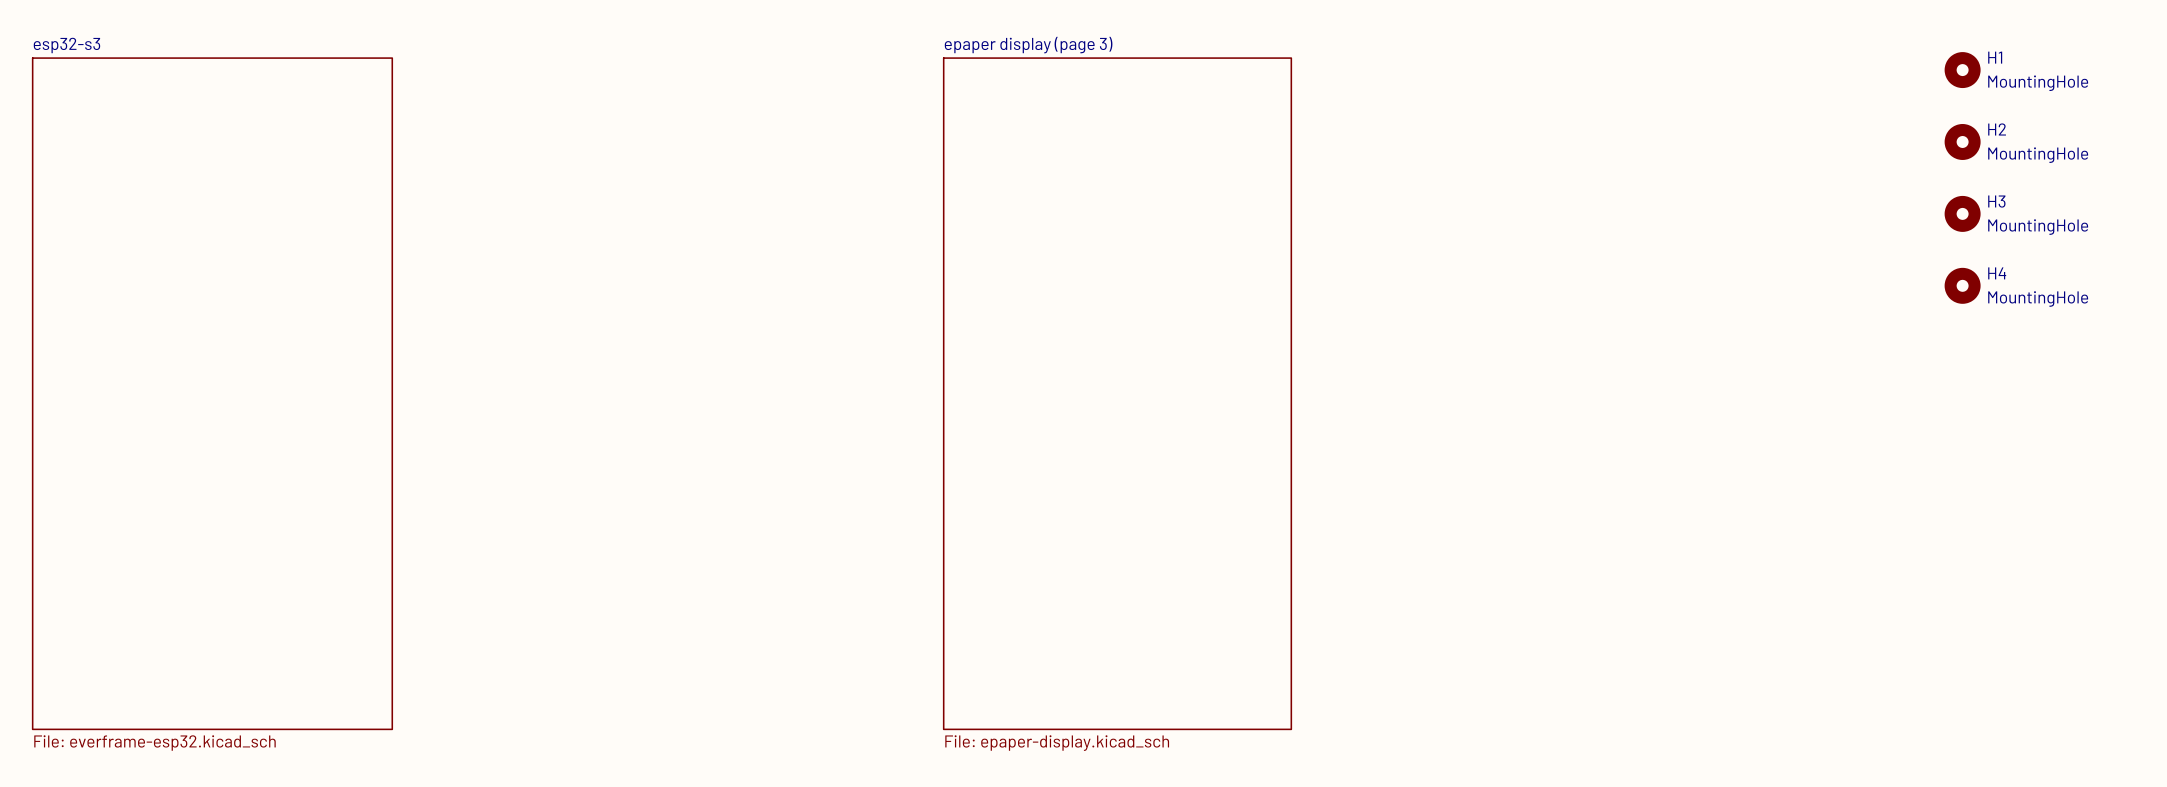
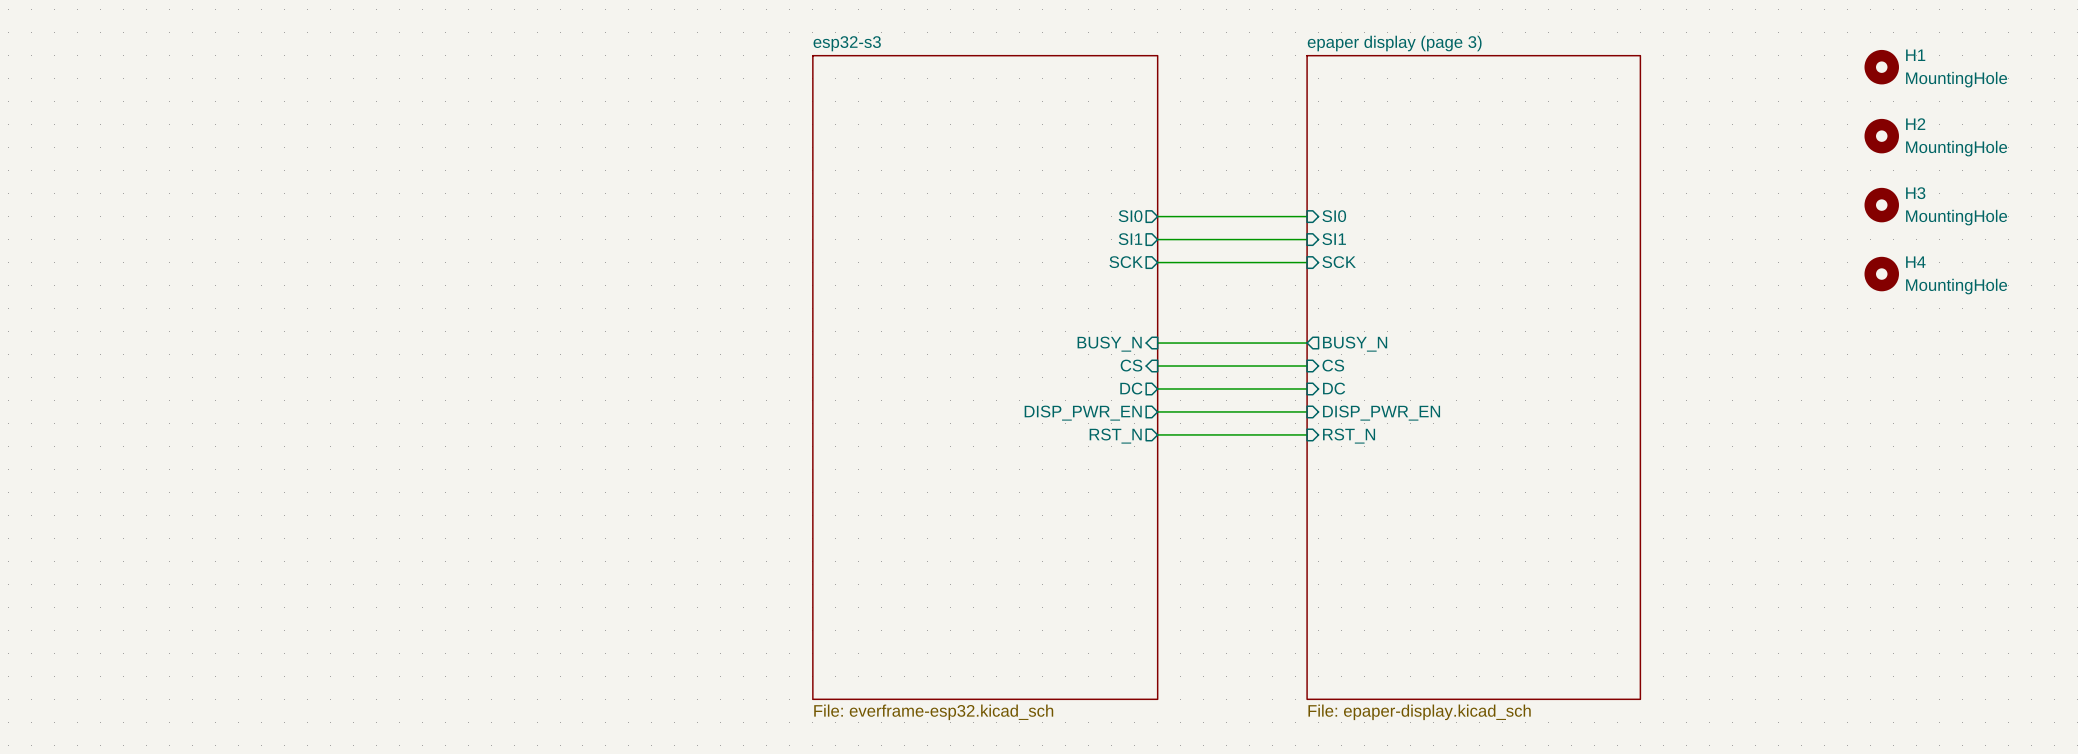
sheet pin: none -> SI0 (1130, 216)
wire: none -> (1157, 216) (1307, 216)
sheet pin: none -> SI0 (1334, 216)
sheet pin: none -> SI1 (1130, 239)
wire: none -> (1157, 239) (1307, 239)
sheet pin: none -> SI1 (1334, 239)
sheet pin: none -> SCK (1126, 262)
wire: none -> (1157, 262) (1307, 262)
sheet pin: none -> SCK (1339, 262)
sheet pin: none -> BUSY_N (1109, 344)
wire: none -> (1157, 343) (1307, 343)
sheet pin: none -> BUSY_N (1355, 344)
sheet pin: none -> CS (1131, 365)
wire: none -> (1157, 366) (1307, 366)
sheet pin: none -> CS (1333, 365)
sheet esp32-s3 position: (212, 393) -> (985, 377)
sheet epaper display (page 3) position: (1117, 393) -> (1473, 377)
sheet pin: none -> DC (1131, 388)
wire: none -> (1157, 388) (1307, 388)
sheet pin: none -> DC (1334, 388)
sheet pin: none -> DISP_PWR_EN (1083, 413)
wire: none -> (1157, 411) (1307, 411)
sheet pin: none -> DISP_PWR_EN (1381, 413)
sheet pin: none -> RST_N (1115, 436)
wire: none -> (1157, 434) (1307, 434)
sheet pin: none -> RST_N (1349, 436)

